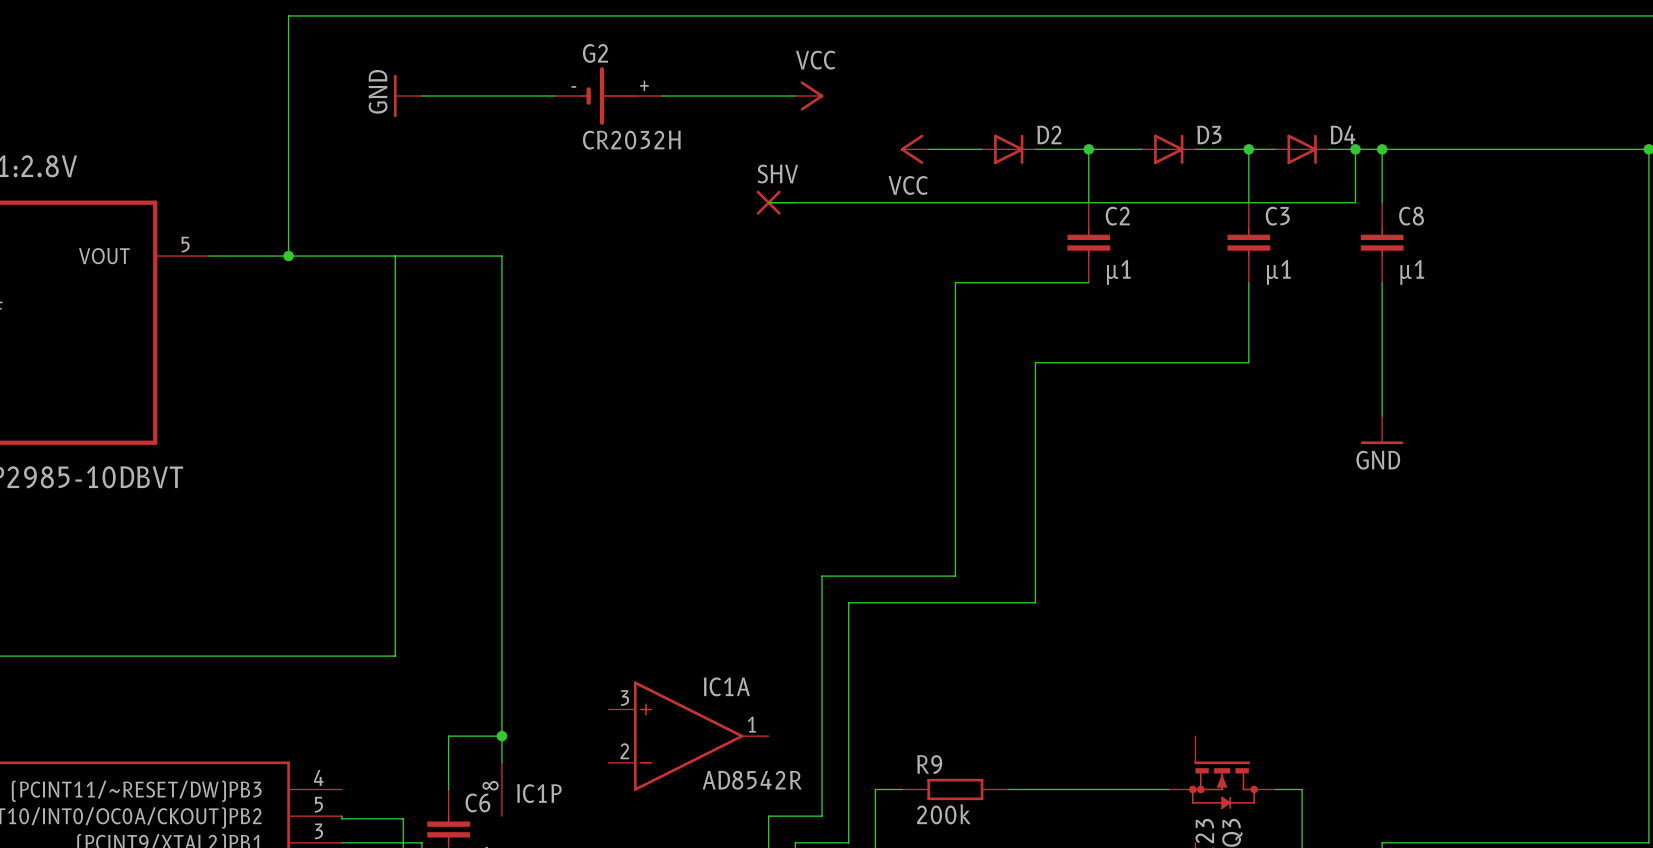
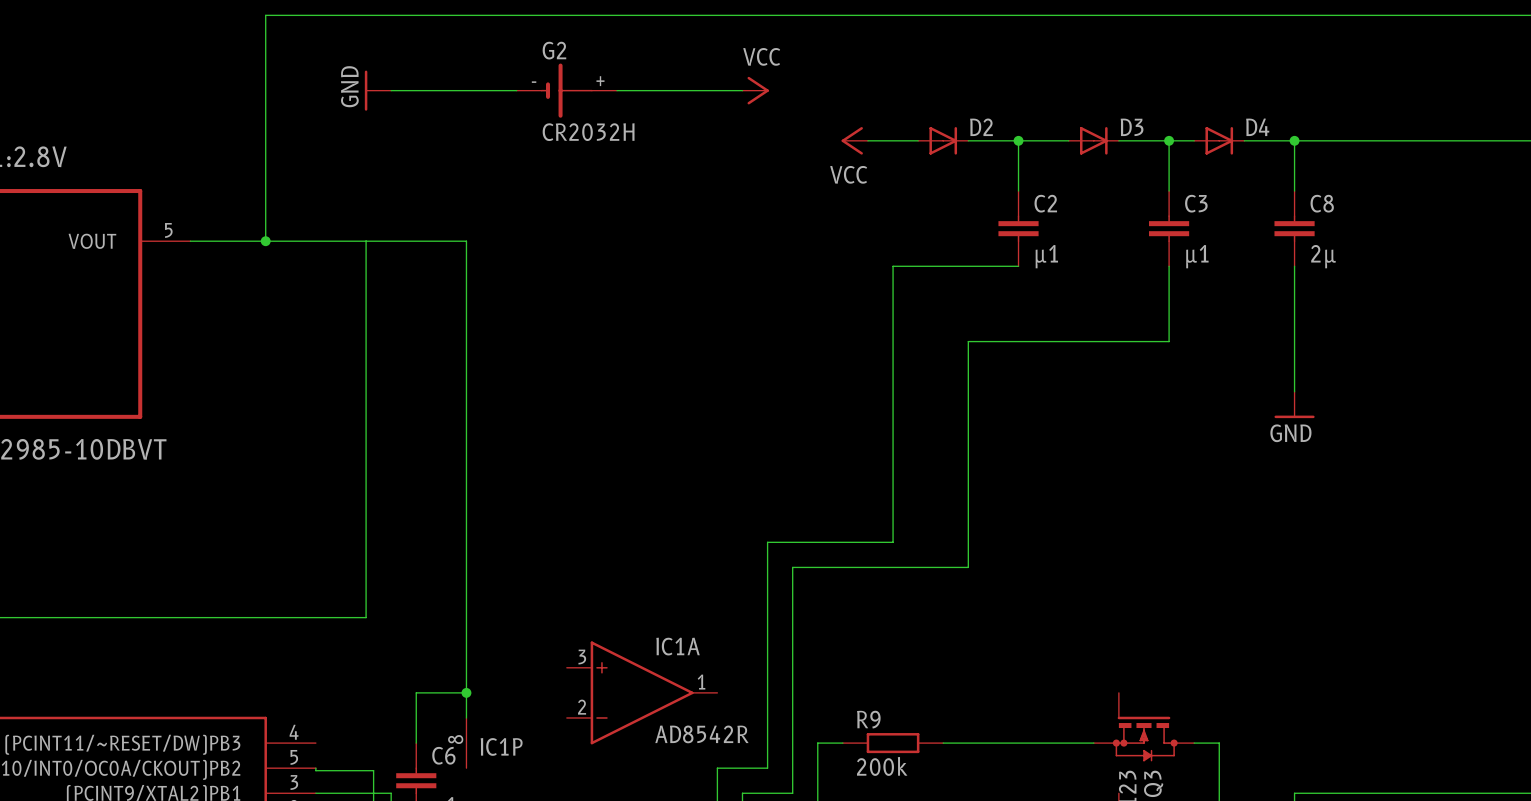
wire: (1355, 149) (1355, 202) (768, 202) -> none
junction: (1355, 149) -> none
SHV: (776, 202) -> none
C8 value: µ1 (1412, 272) -> 2µ (1323, 256)

